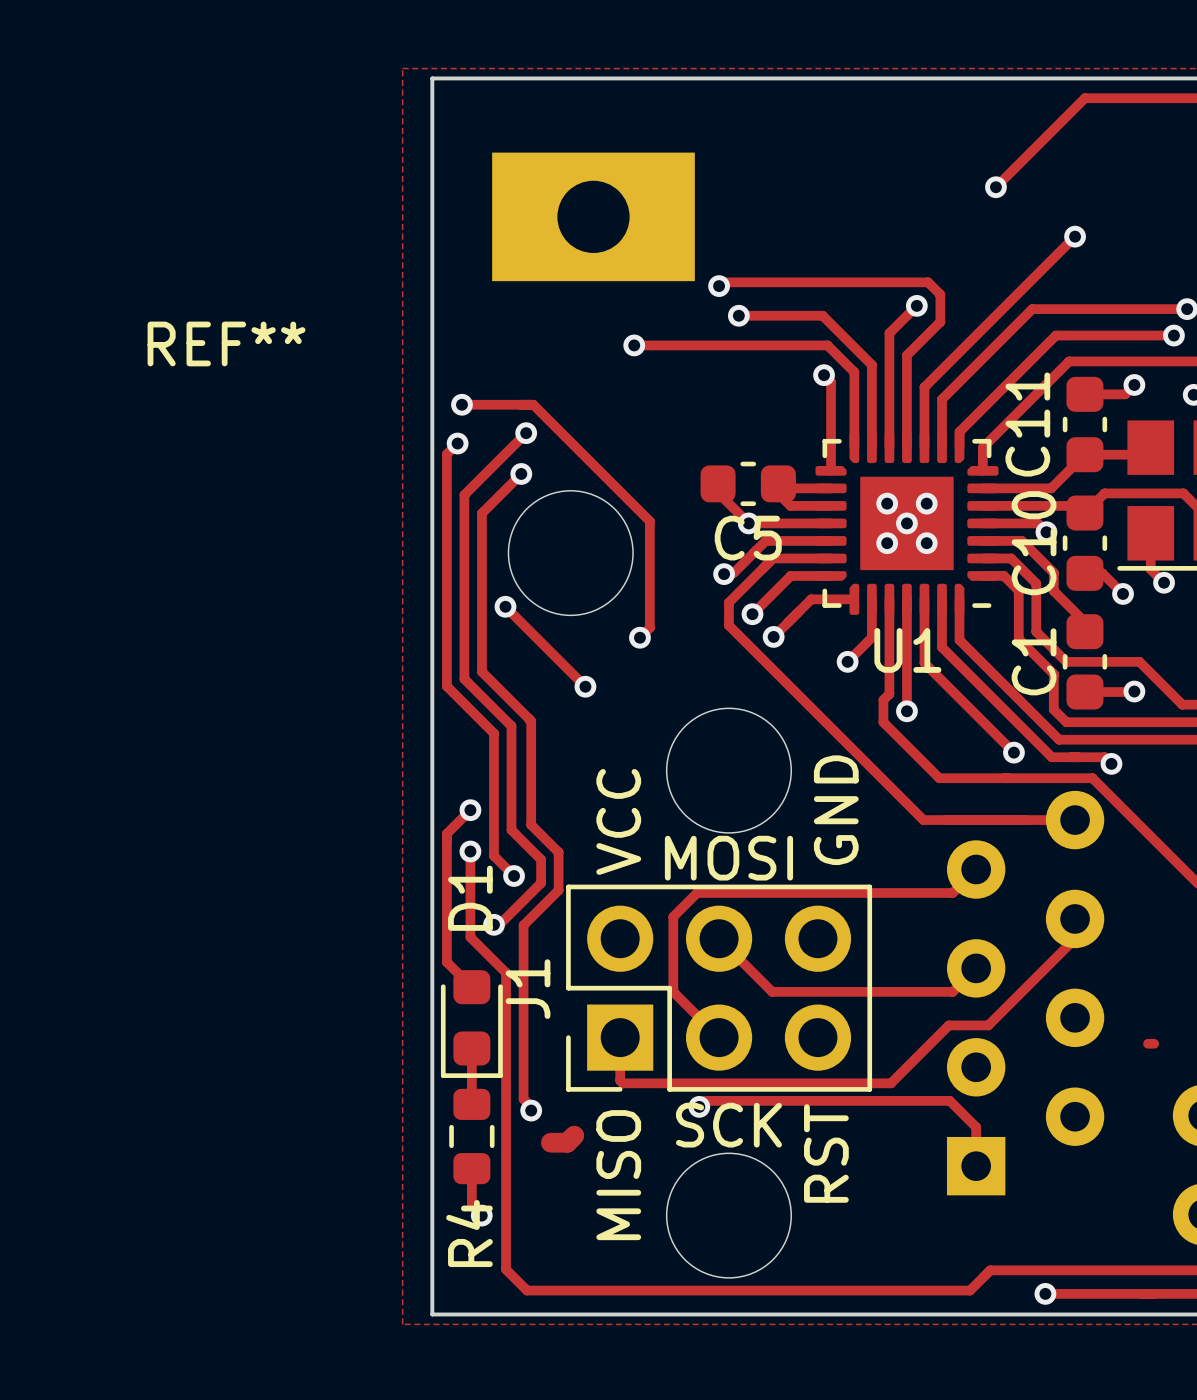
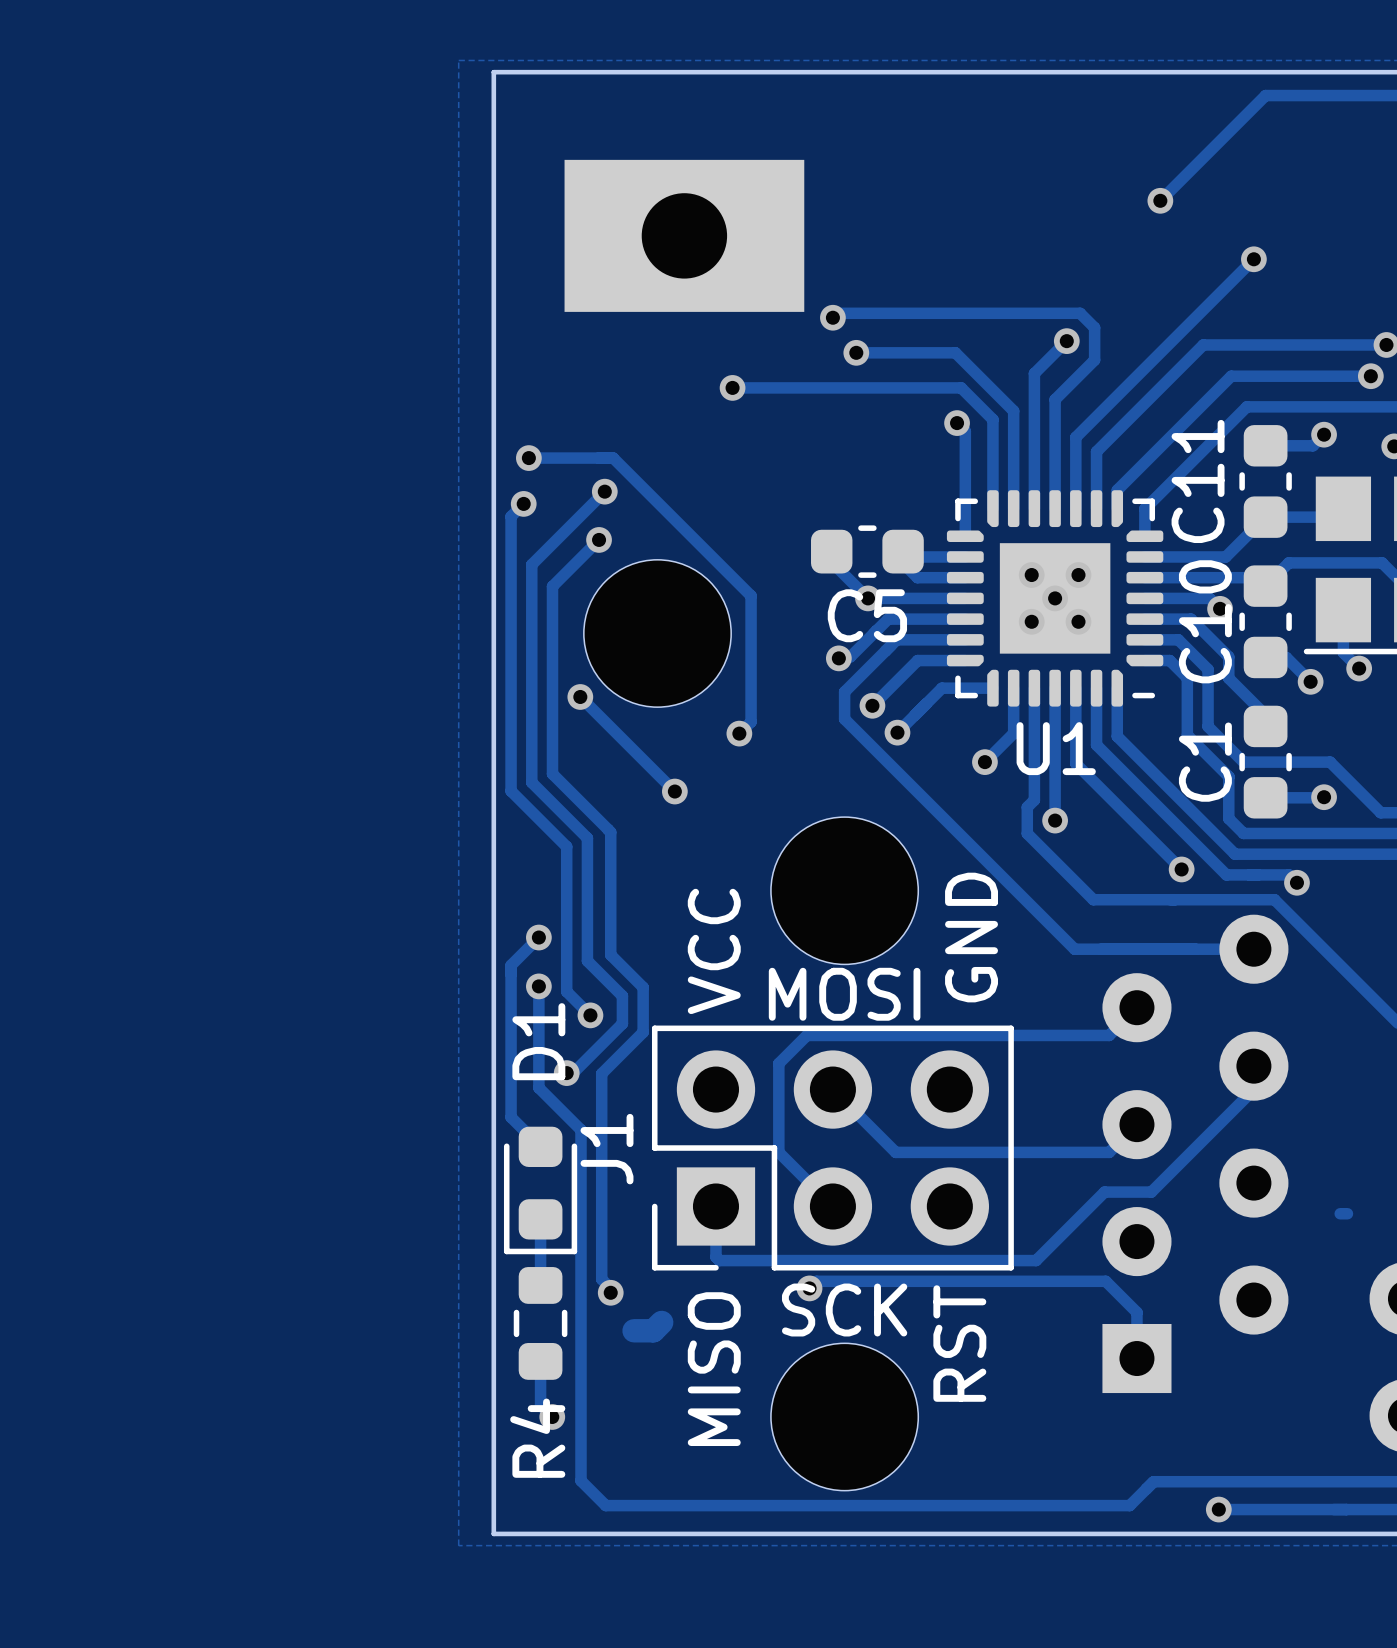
REF** name: REF** (226, 343) -> none

